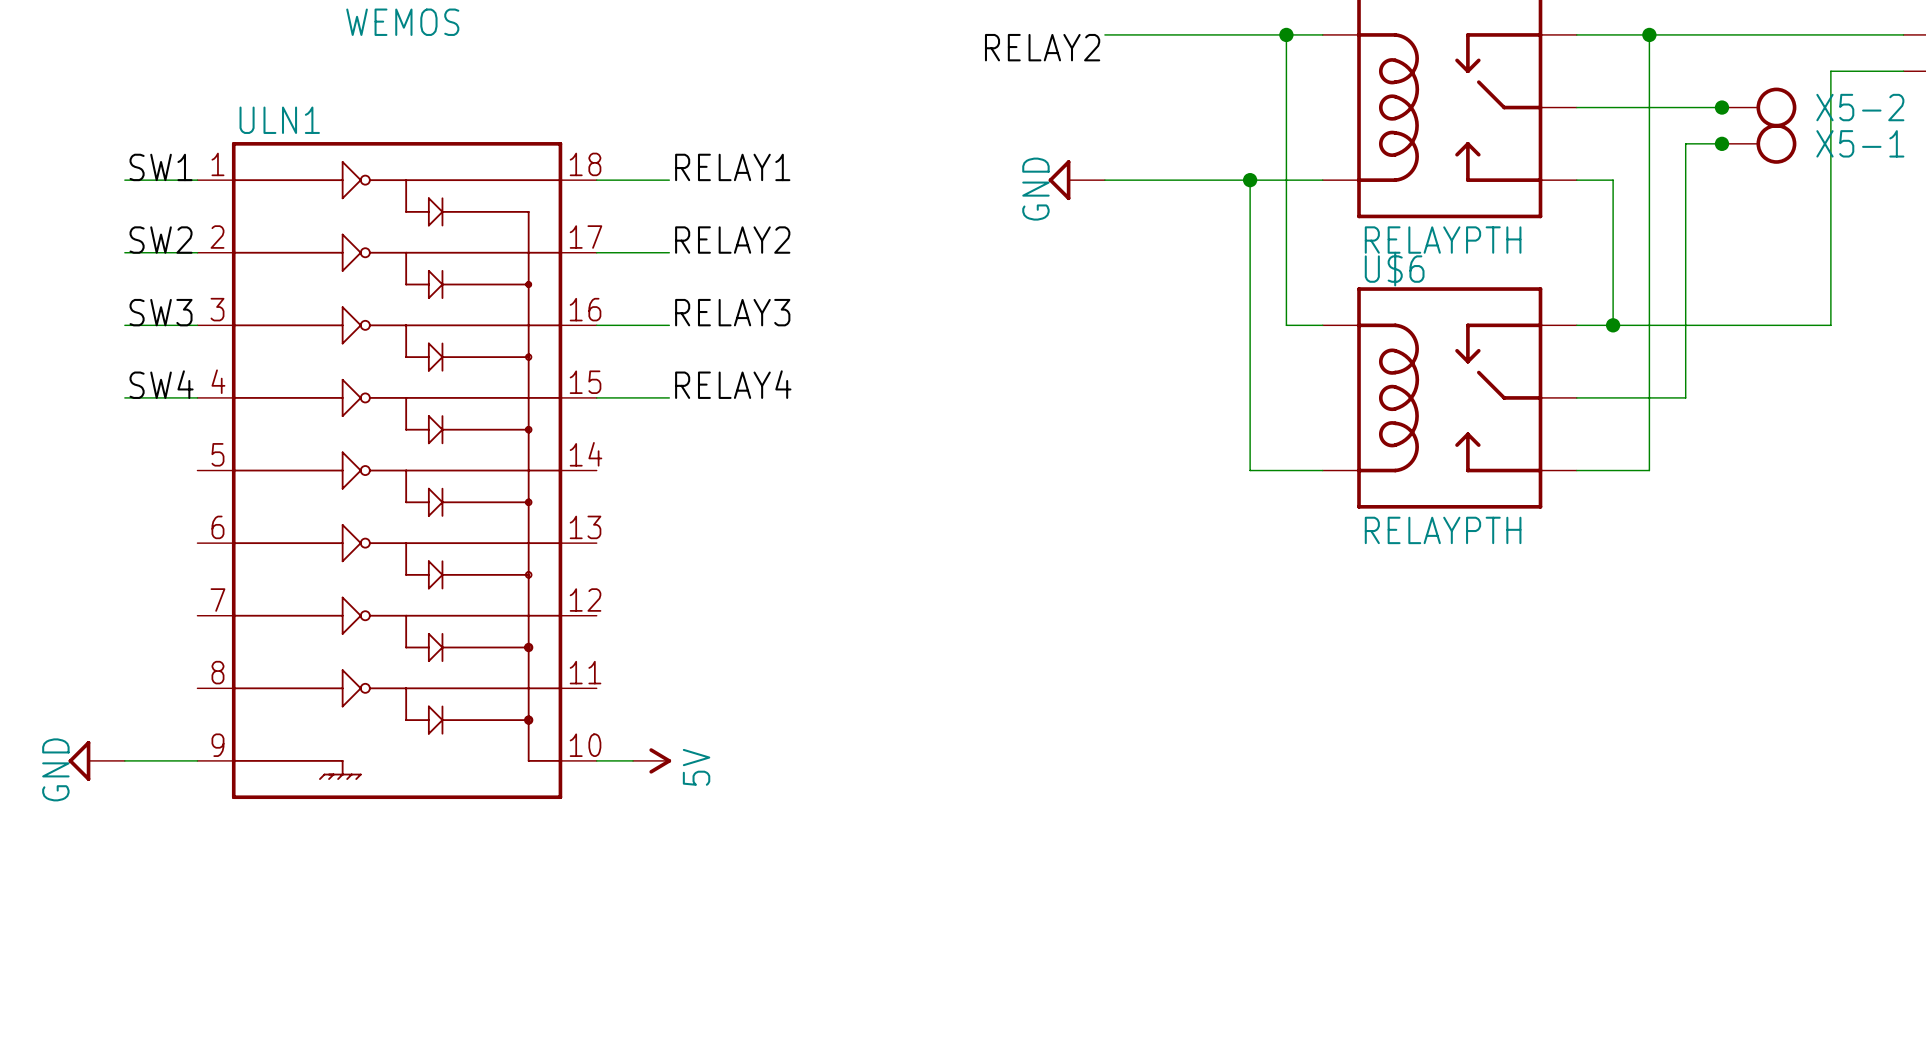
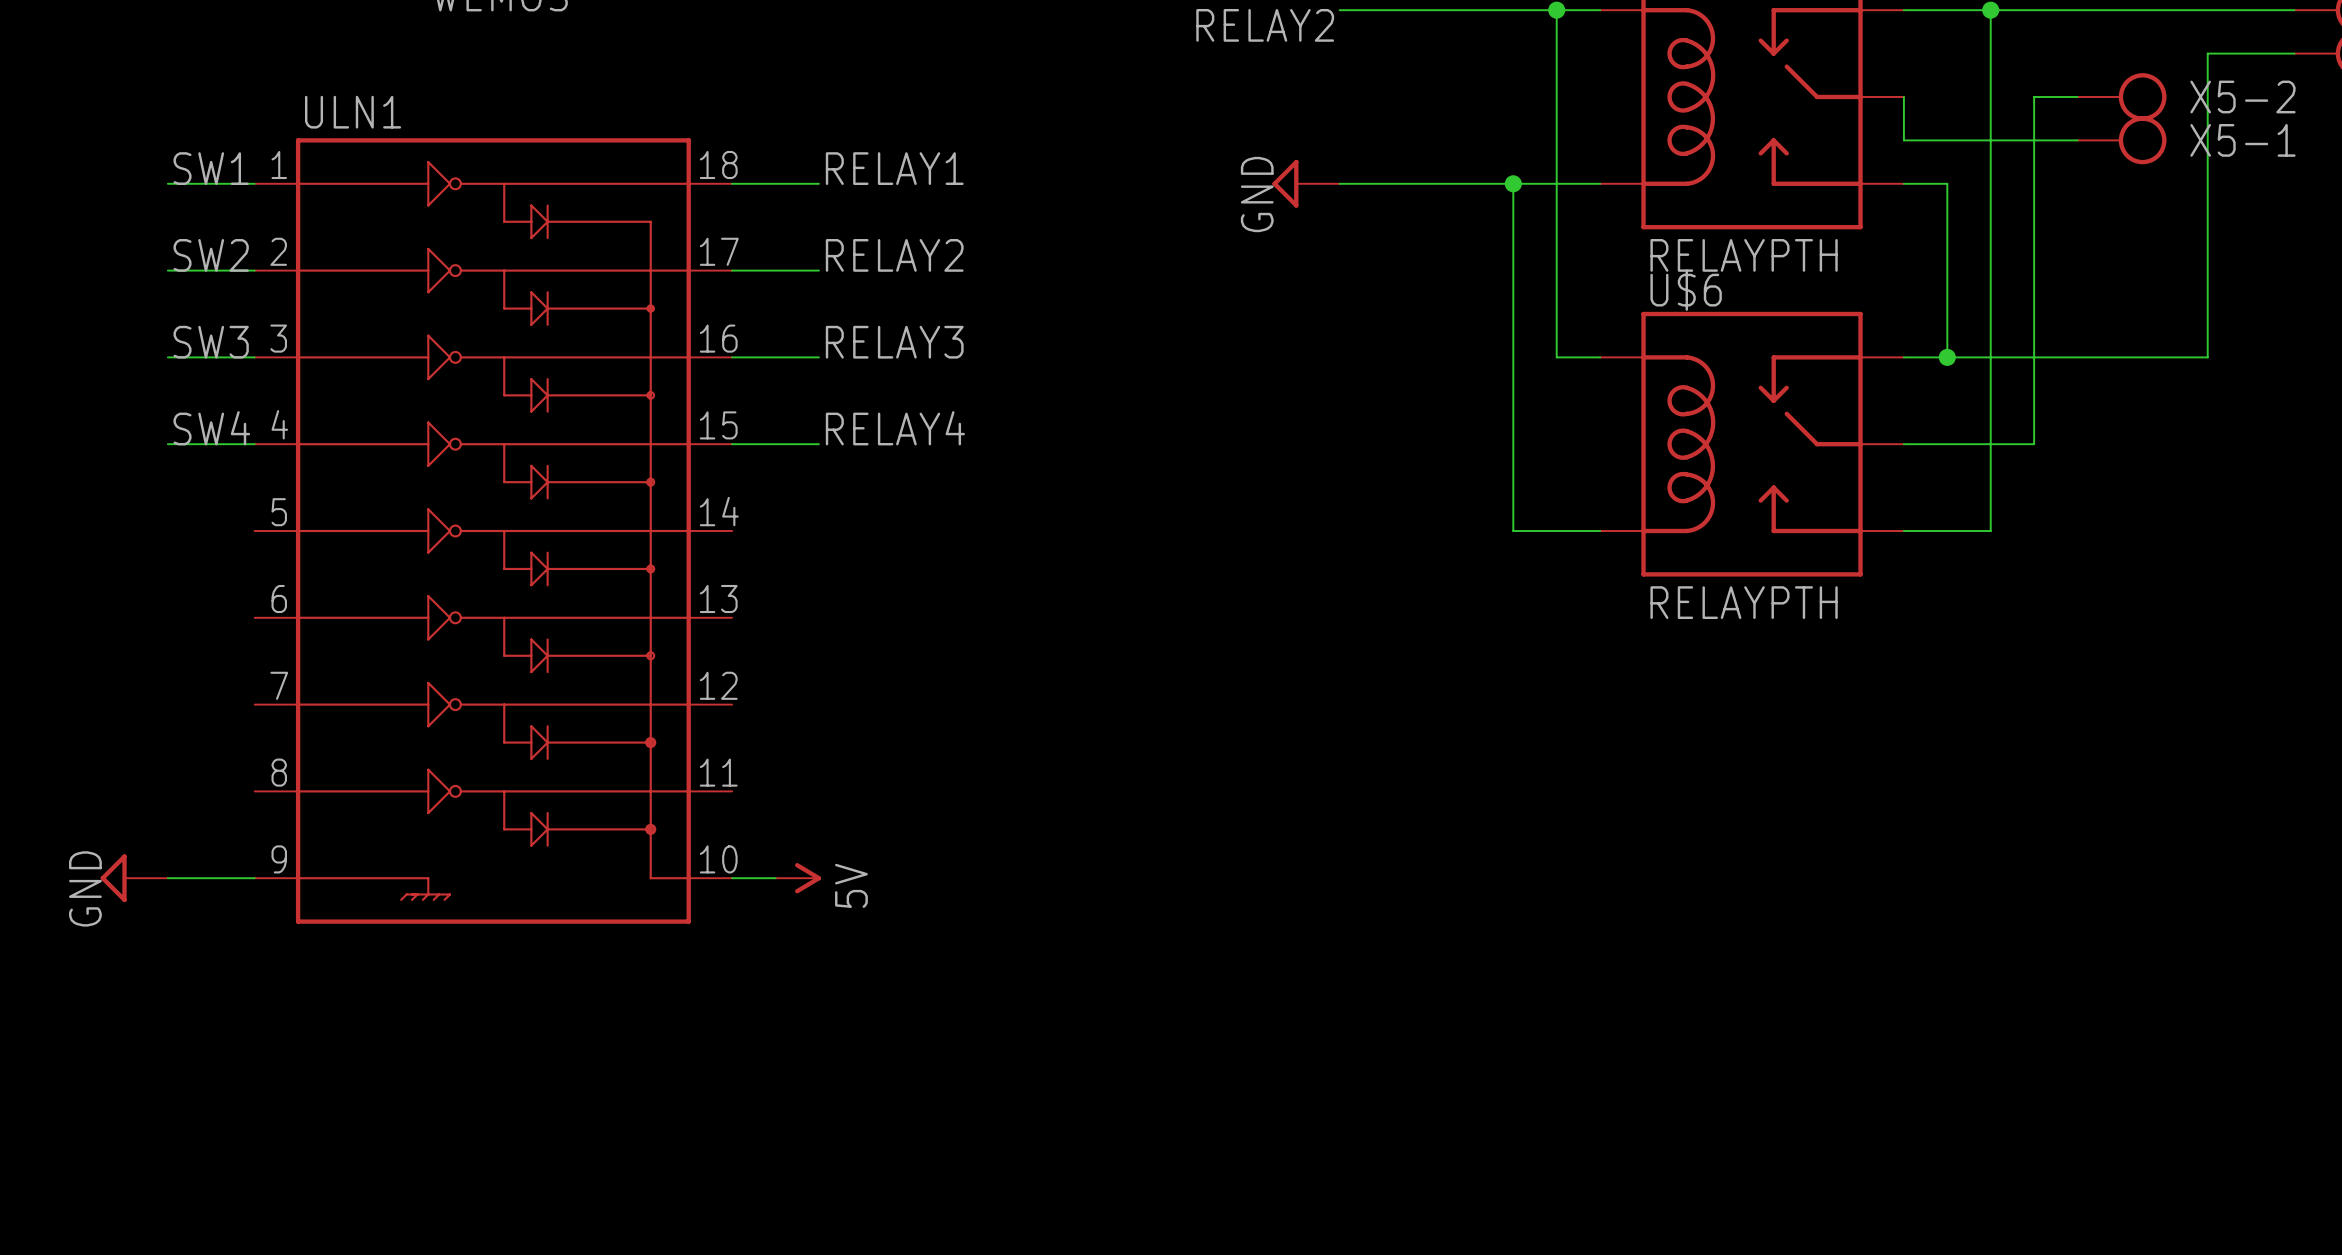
wire: (1576, 107) (1685, 107) -> (1903, 96) (1903, 140) (2034, 140) (2034, 96)
junction: (1721, 107) -> none
junction: (1721, 143) -> none

